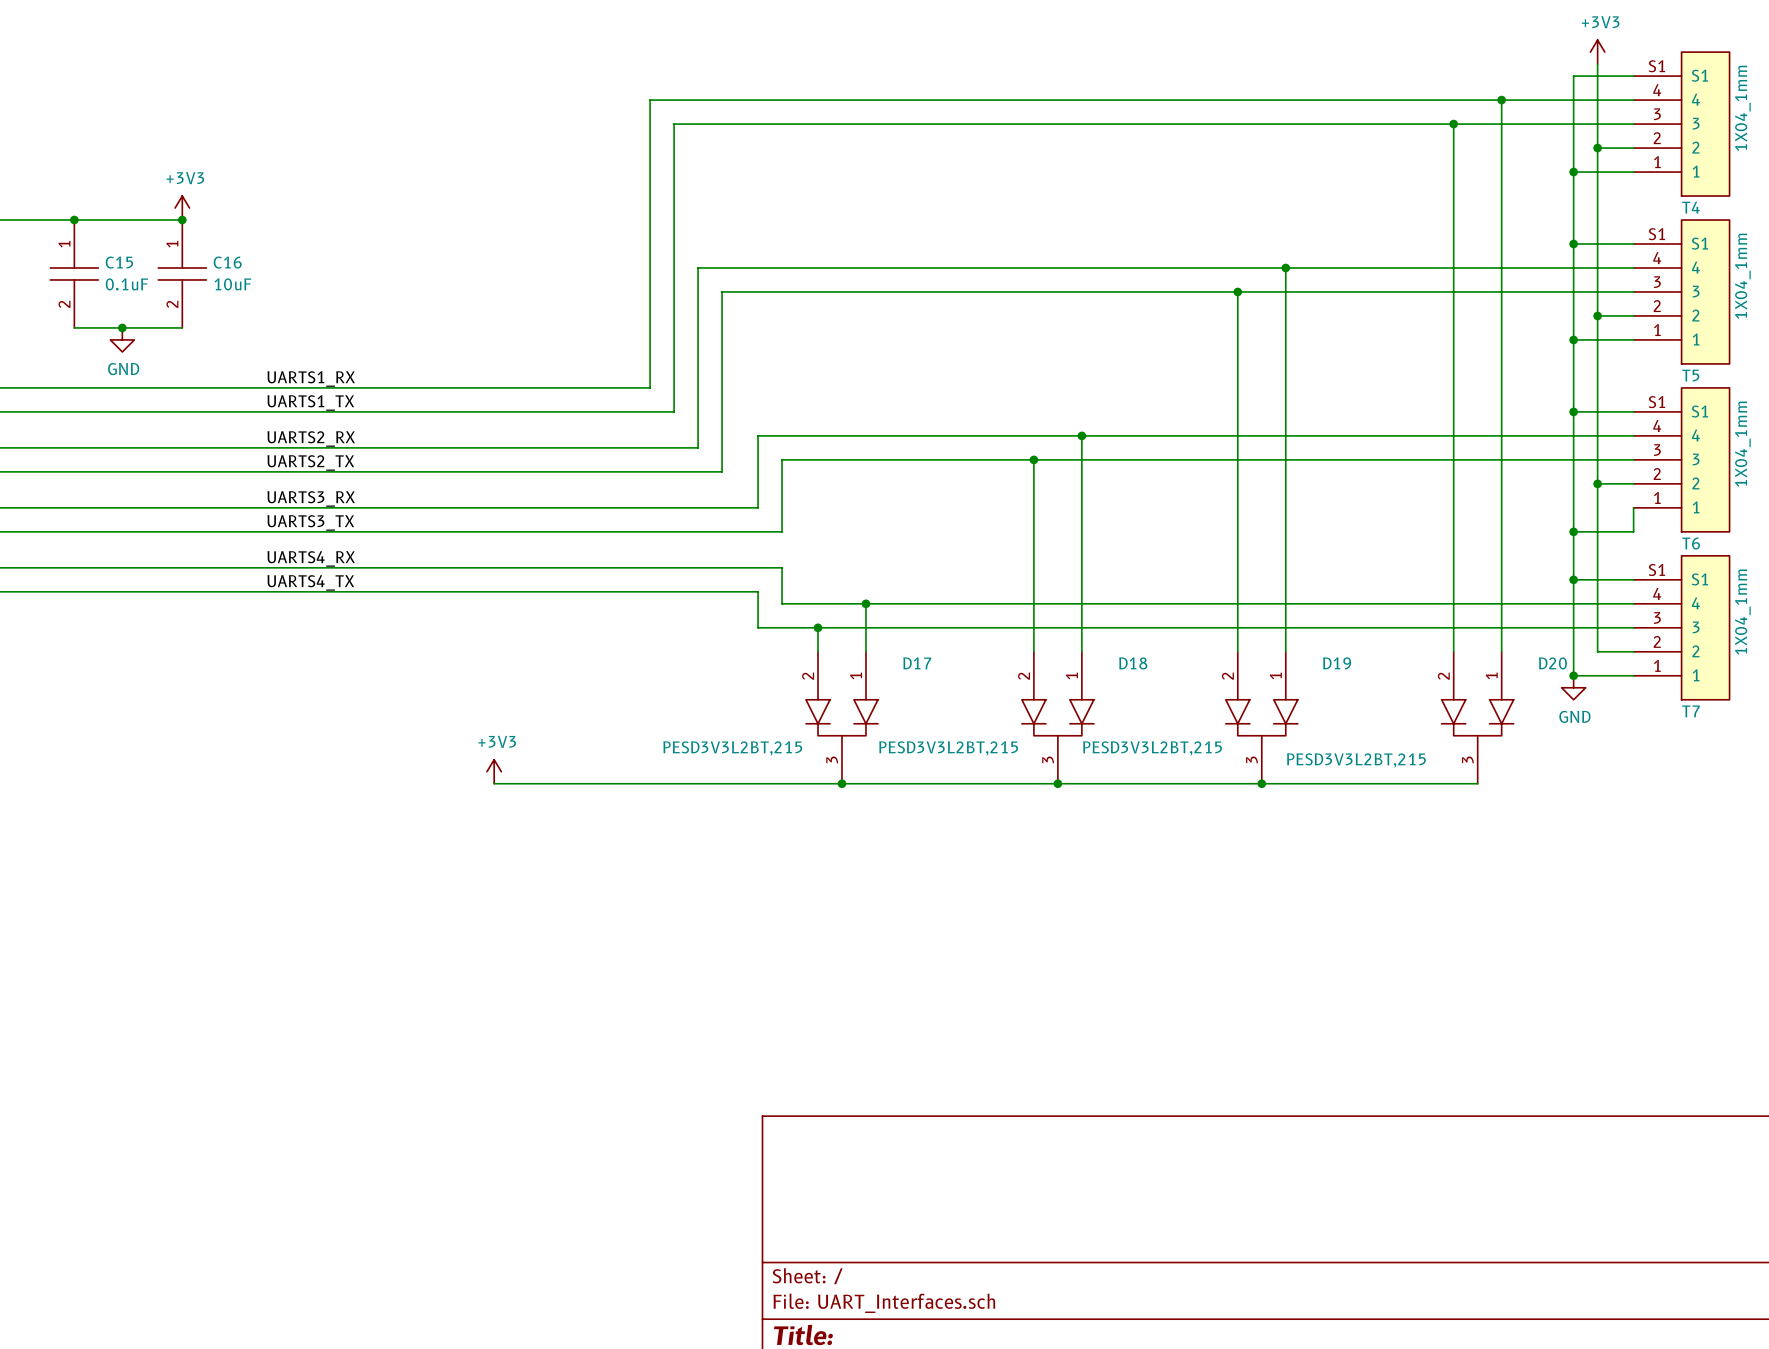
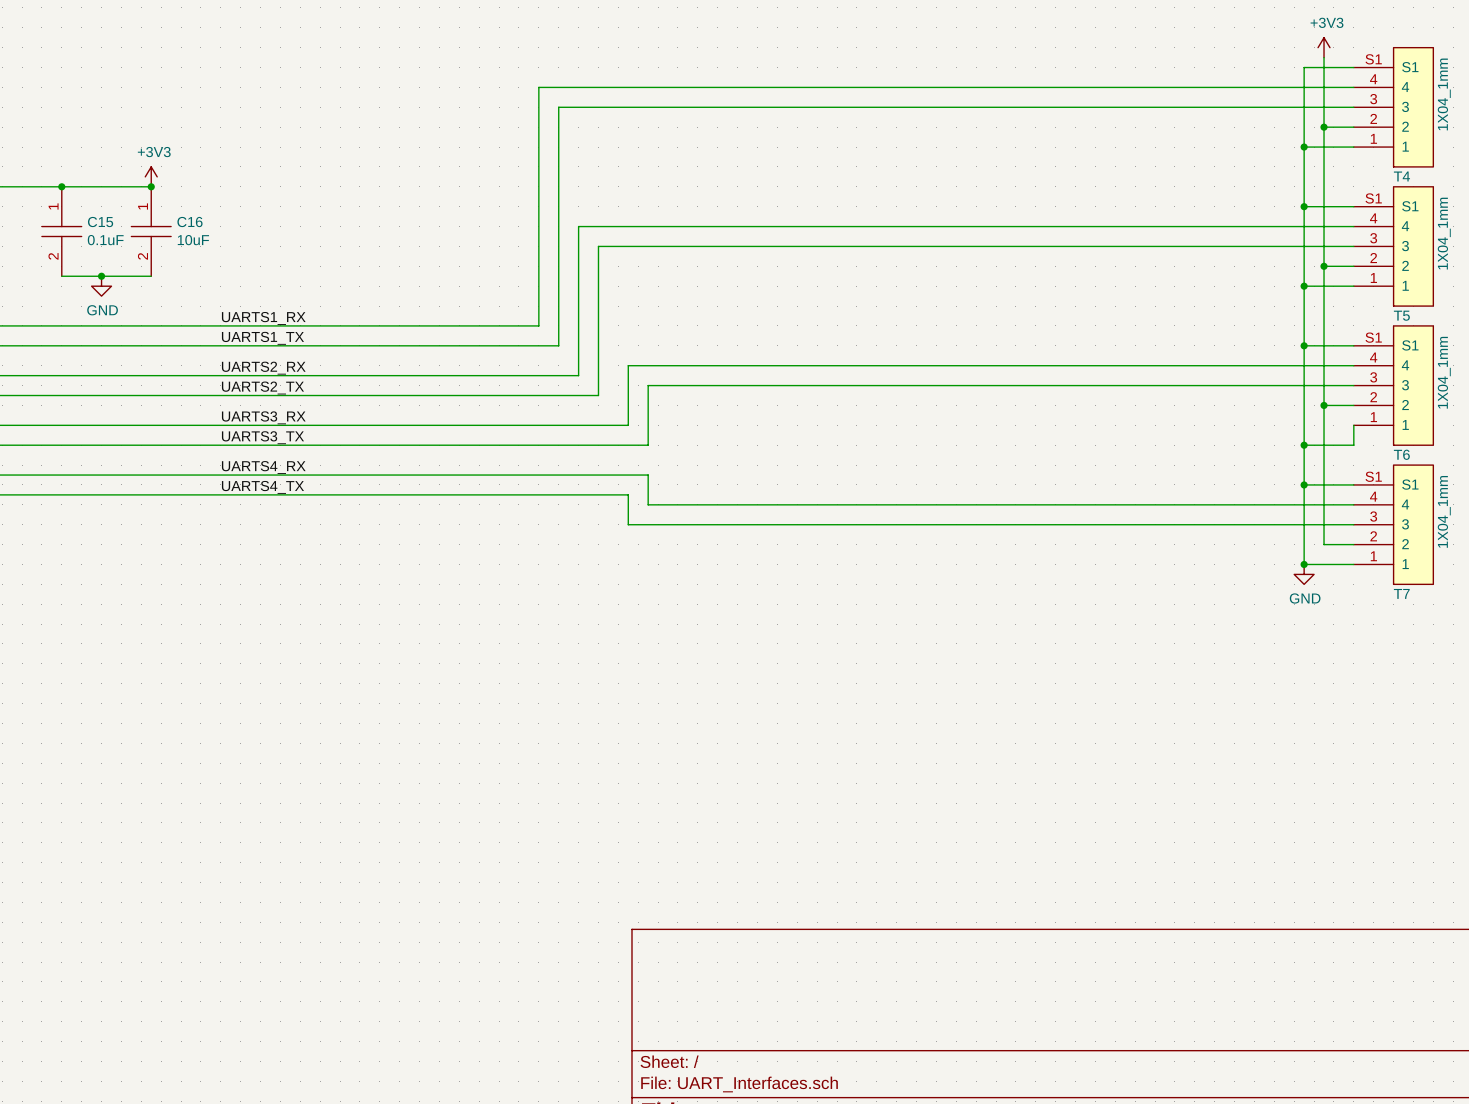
wire: (1501, 100) (1501, 651) -> none
junction: (1501, 100) -> none
wire: (1453, 124) (1453, 651) -> none
junction: (1453, 124) -> none
wire: (1285, 267) (1285, 651) -> none
junction: (1285, 267) -> none
wire: (1237, 291) (1237, 651) -> none
junction: (1237, 291) -> none
wire: (1081, 435) (1081, 651) -> none
junction: (1081, 435) -> none
wire: (1033, 459) (1033, 651) -> none
junction: (1033, 459) -> none
wire: (865, 603) (865, 651) -> none
junction: (865, 603) -> none
wire: (818, 627) (818, 651) -> none
junction: (818, 627) -> none
D17: (841, 717) -> none
D18: (1057, 717) -> none
D19: (1261, 717) -> none
D20: (1477, 717) -> none
power symbol: +3V3 (494, 771) -> none
wire: (494, 783) (1477, 783) -> none
junction: (841, 783) -> none
junction: (1057, 783) -> none
junction: (1261, 783) -> none

